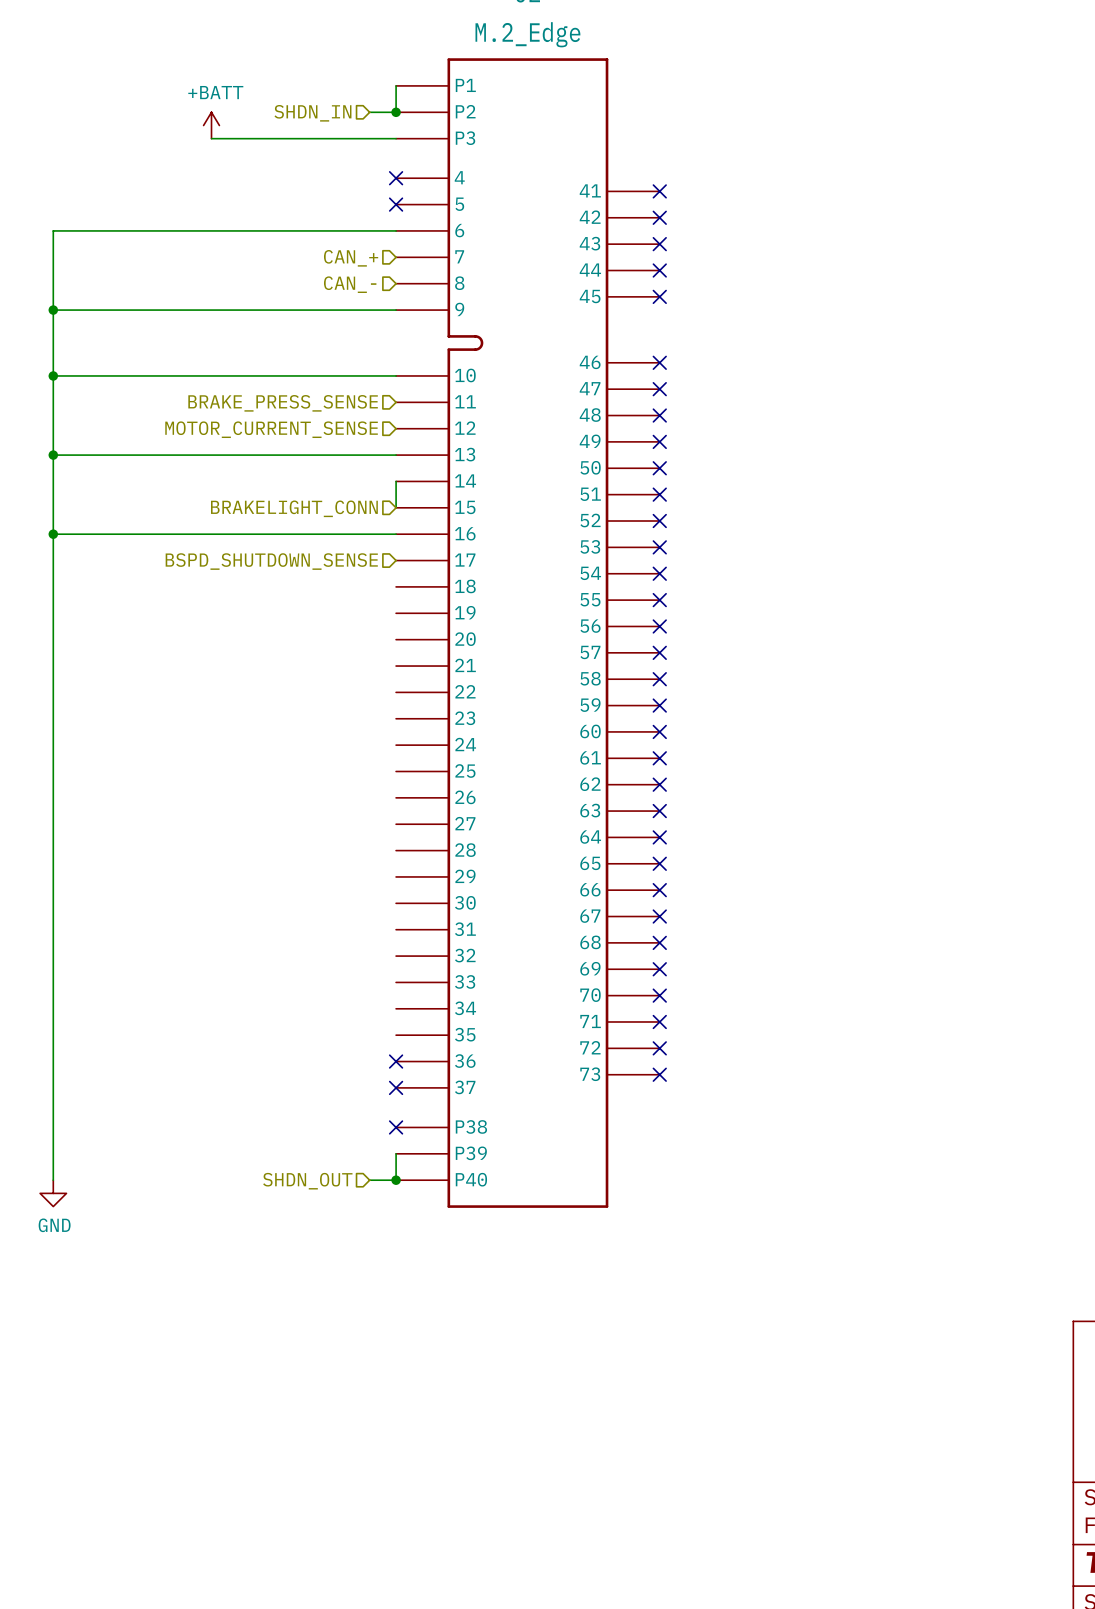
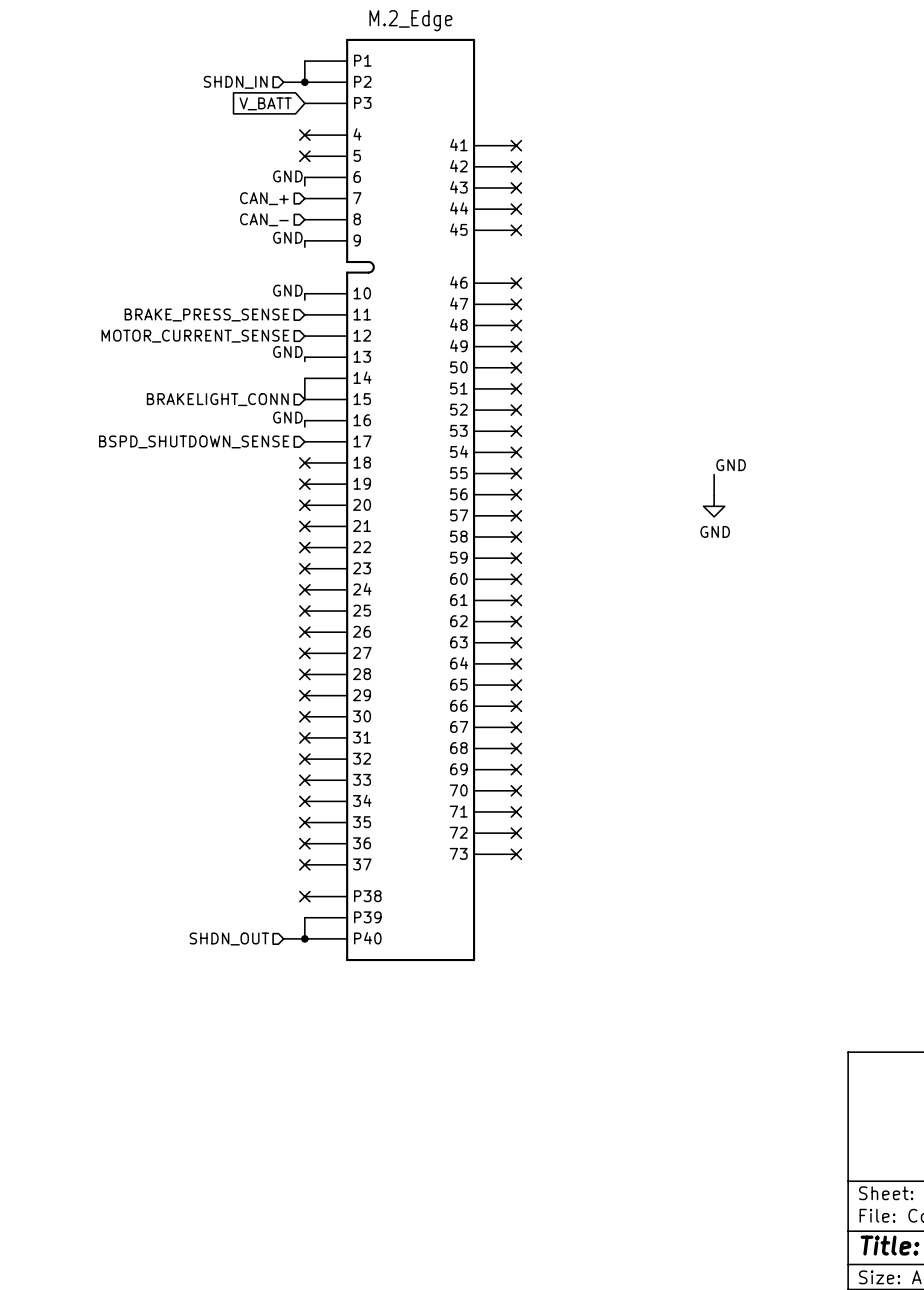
power symbol: +BATT (211, 125) -> none
wire: (211, 138) (396, 138) -> none
global label: none -> V_BATT (265, 103)
label: none -> GND (287, 176)
wire: (396, 230) (53, 230) (53, 1180) -> (304, 177) (304, 185)
label: none -> GND (287, 237)
wire: (53, 310) (396, 310) -> (304, 247) (304, 240)
junction: (53, 310) -> none
label: none -> GND (287, 290)
wire: (53, 375) (396, 375) -> (304, 300) (304, 293)
junction: (53, 375) -> none
label: none -> GND (287, 352)
wire: (53, 455) (396, 455) -> (304, 361) (304, 357)
junction: (53, 455) -> none
label: none -> GND (287, 417)
wire: (53, 534) (396, 534) -> (304, 427) (304, 420)
junction: (53, 534) -> none
no-connect mark: none -> (304, 462)
label: none -> GND (731, 465)
wire: none -> (714, 474) (714, 495)
no-connect mark: none -> (304, 484)
no-connect mark: none -> (304, 505)
power symbol: none -> GND (714, 506)
no-connect mark: none -> (304, 526)
no-connect mark: none -> (304, 547)
no-connect mark: none -> (304, 568)
no-connect mark: none -> (304, 589)
no-connect mark: none -> (304, 611)
no-connect mark: none -> (304, 632)
no-connect mark: none -> (304, 653)
no-connect mark: none -> (304, 674)
no-connect mark: none -> (304, 695)
no-connect mark: none -> (304, 716)
no-connect mark: none -> (304, 737)
no-connect mark: none -> (304, 759)
no-connect mark: none -> (304, 780)
no-connect mark: none -> (304, 801)
no-connect mark: none -> (304, 822)
power symbol: GND (53, 1193) -> none

